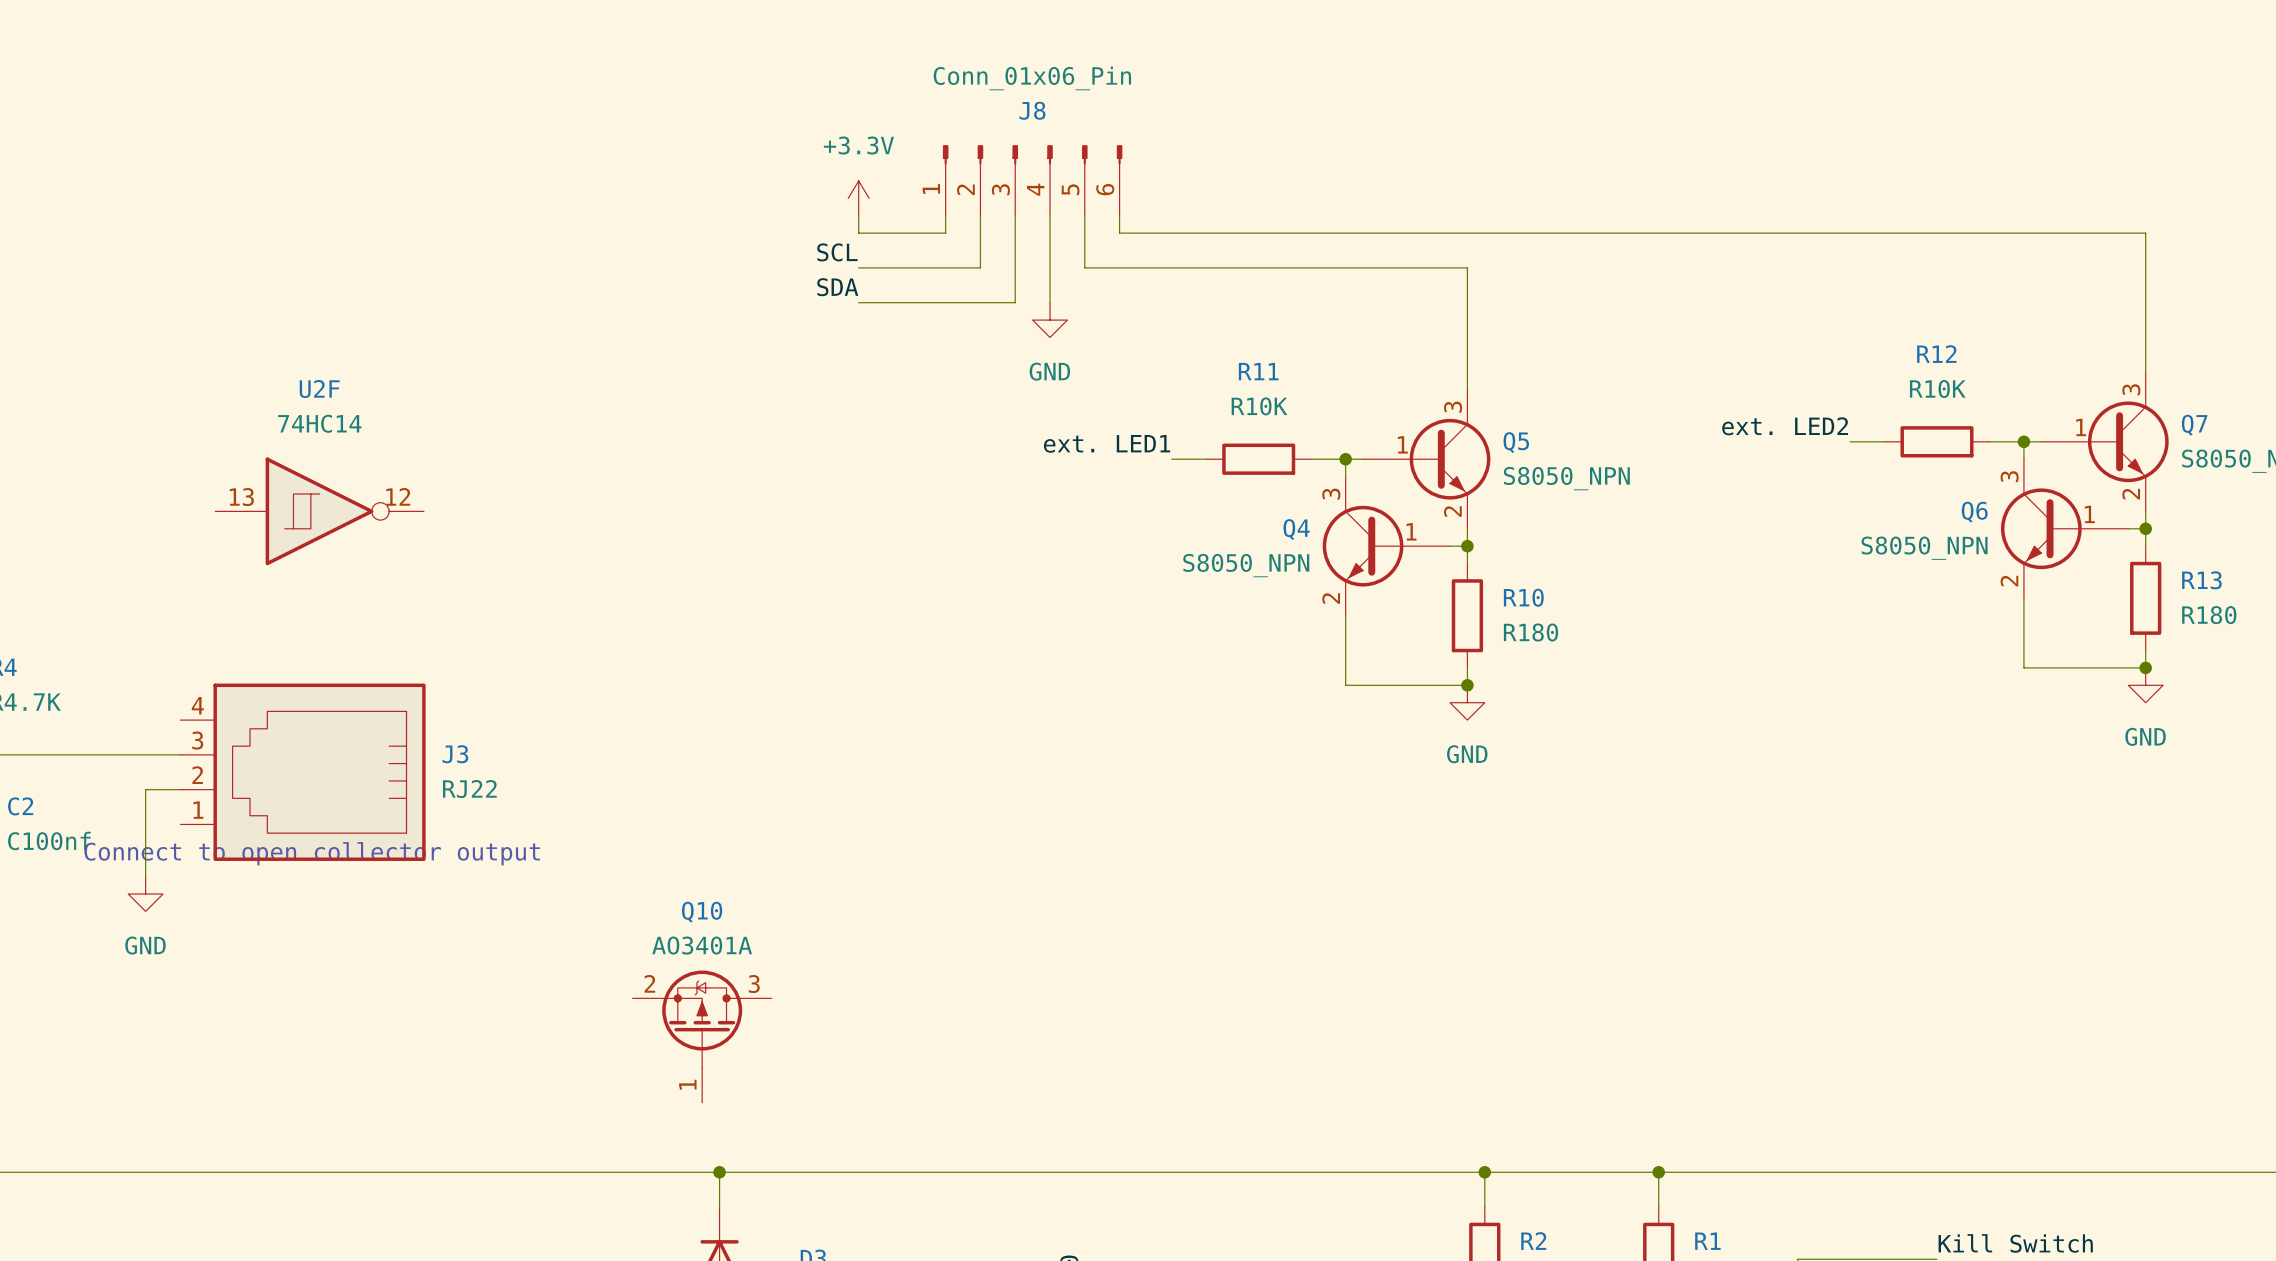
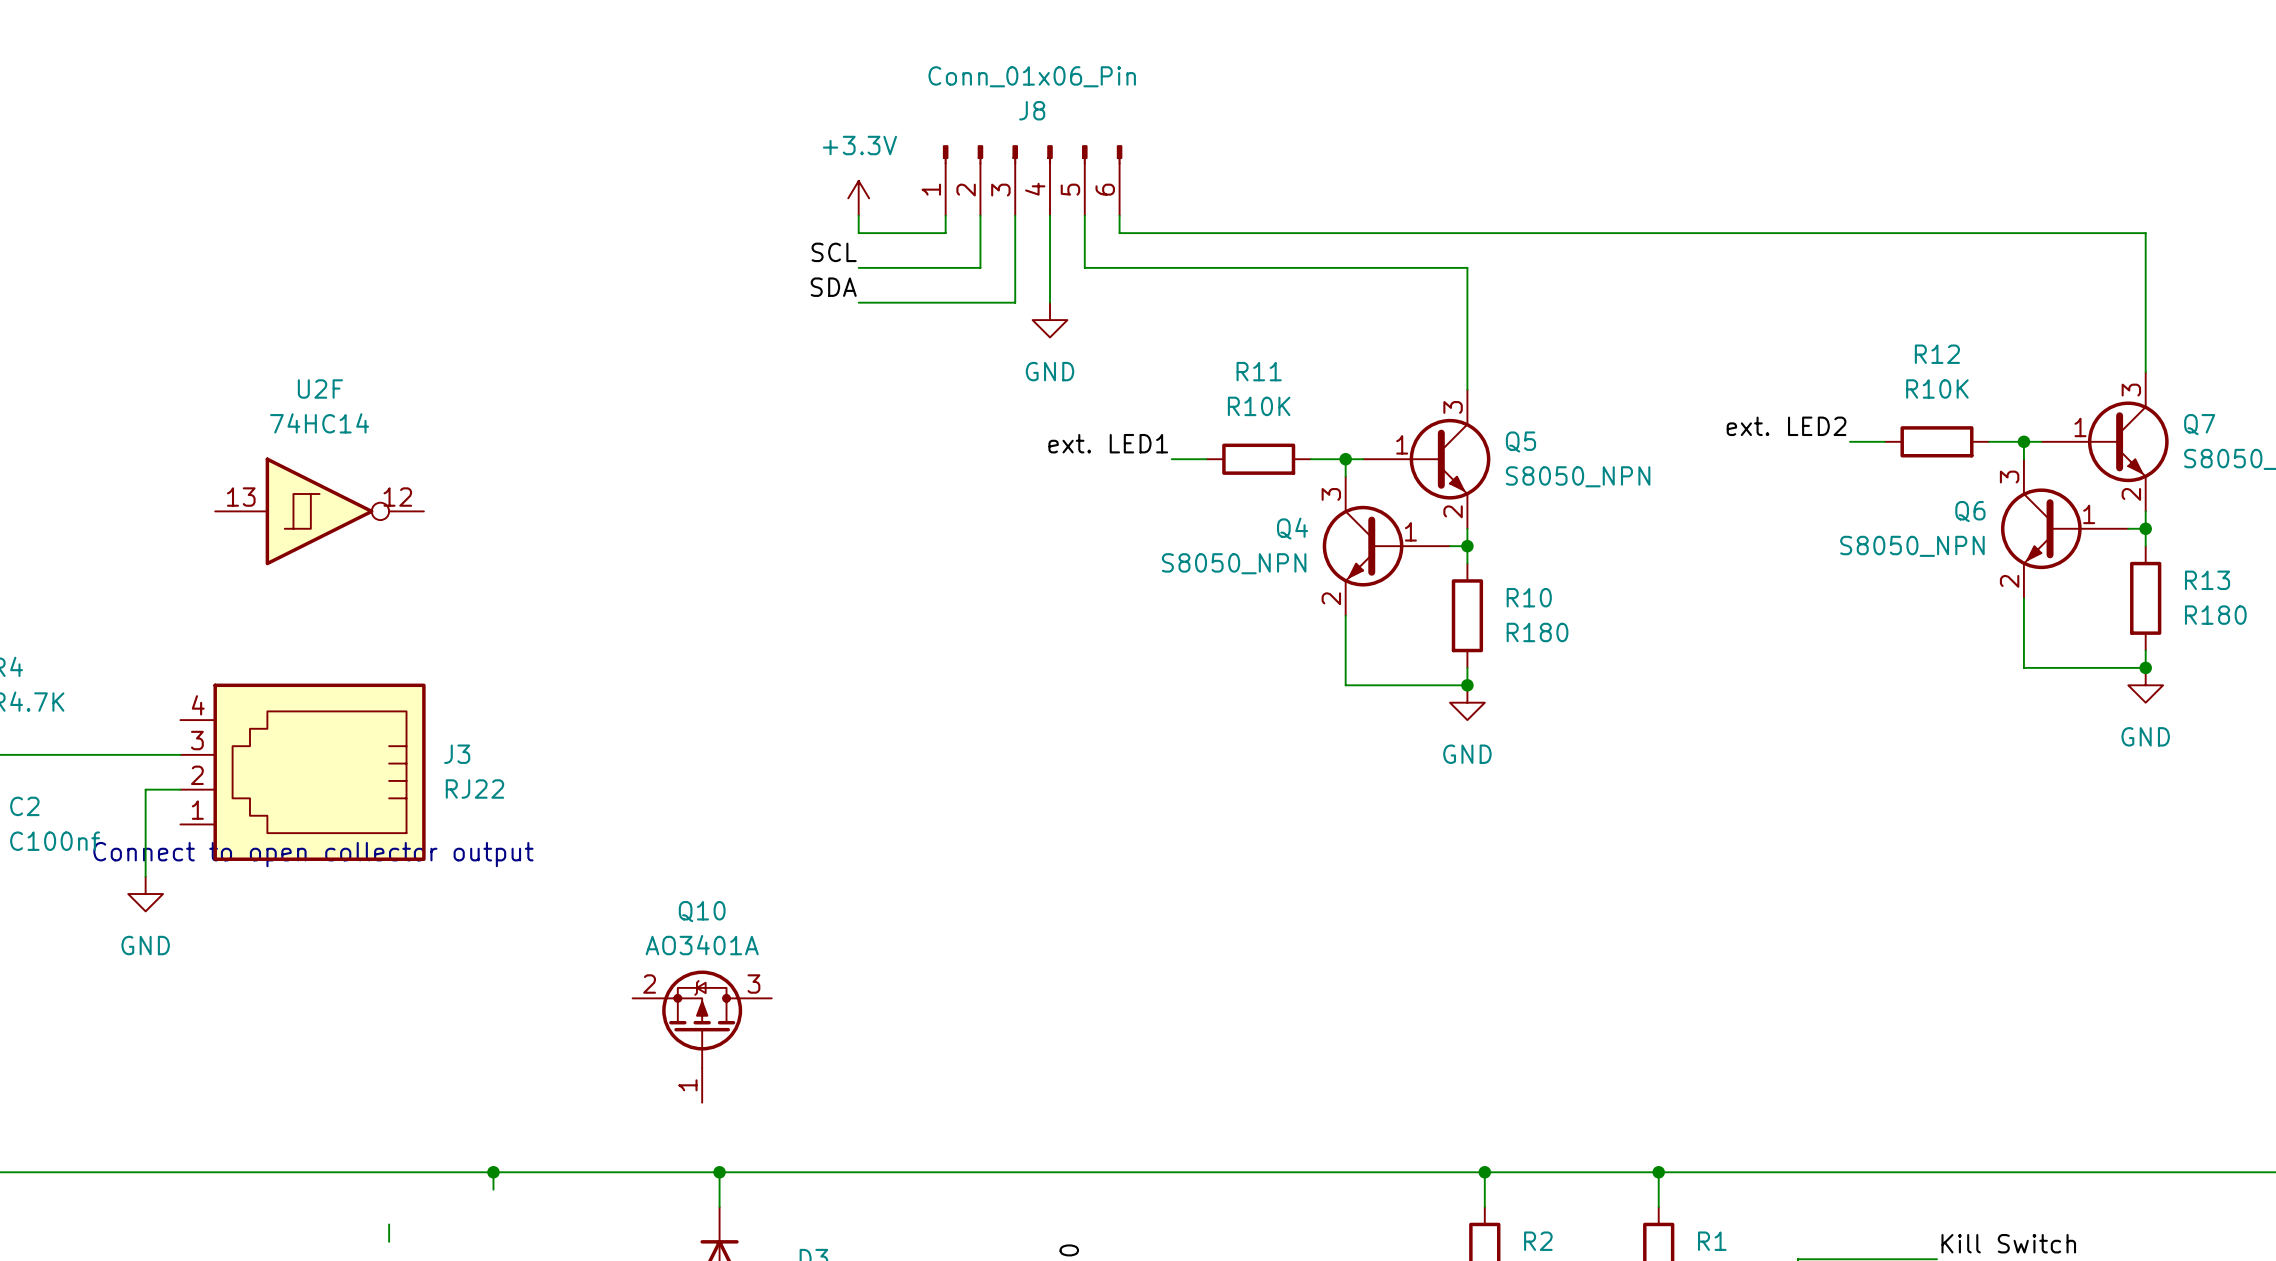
wire: none -> (493, 1172) (493, 1189)
junction: none -> (493, 1172)
wire: none -> (389, 1224) (389, 1241)

